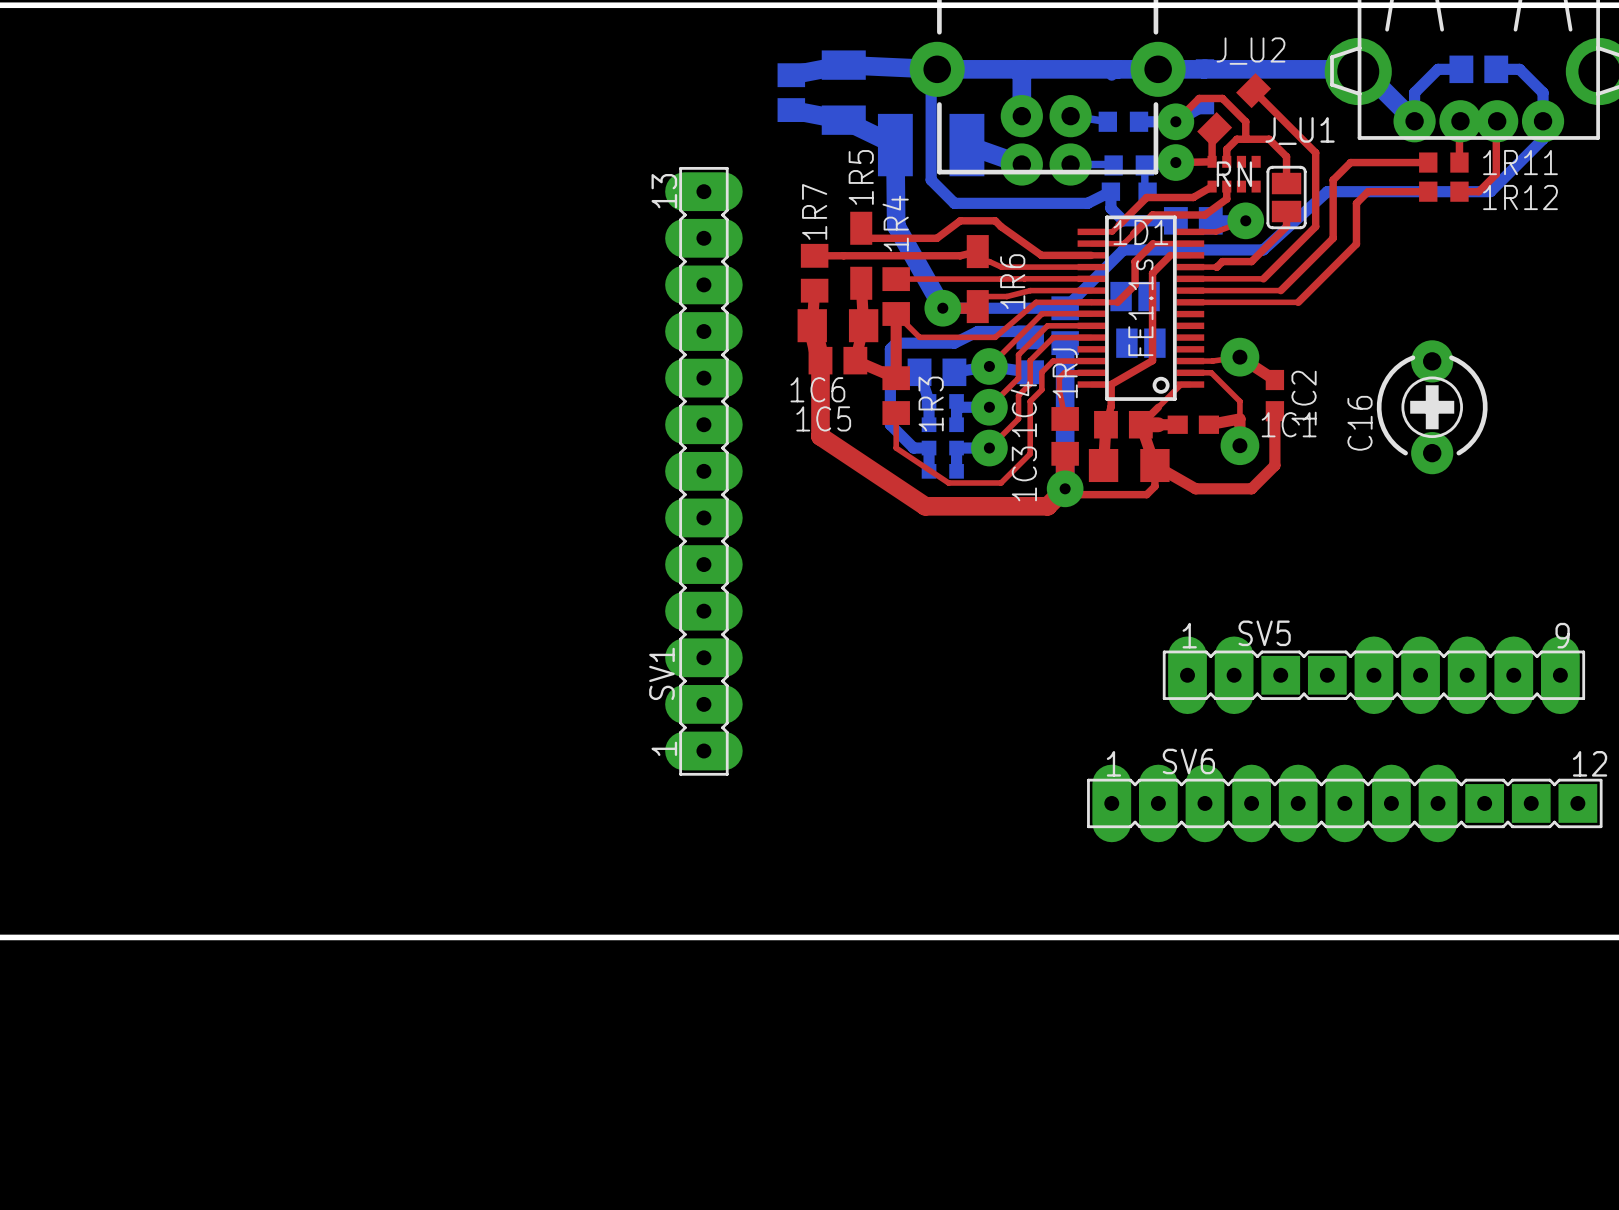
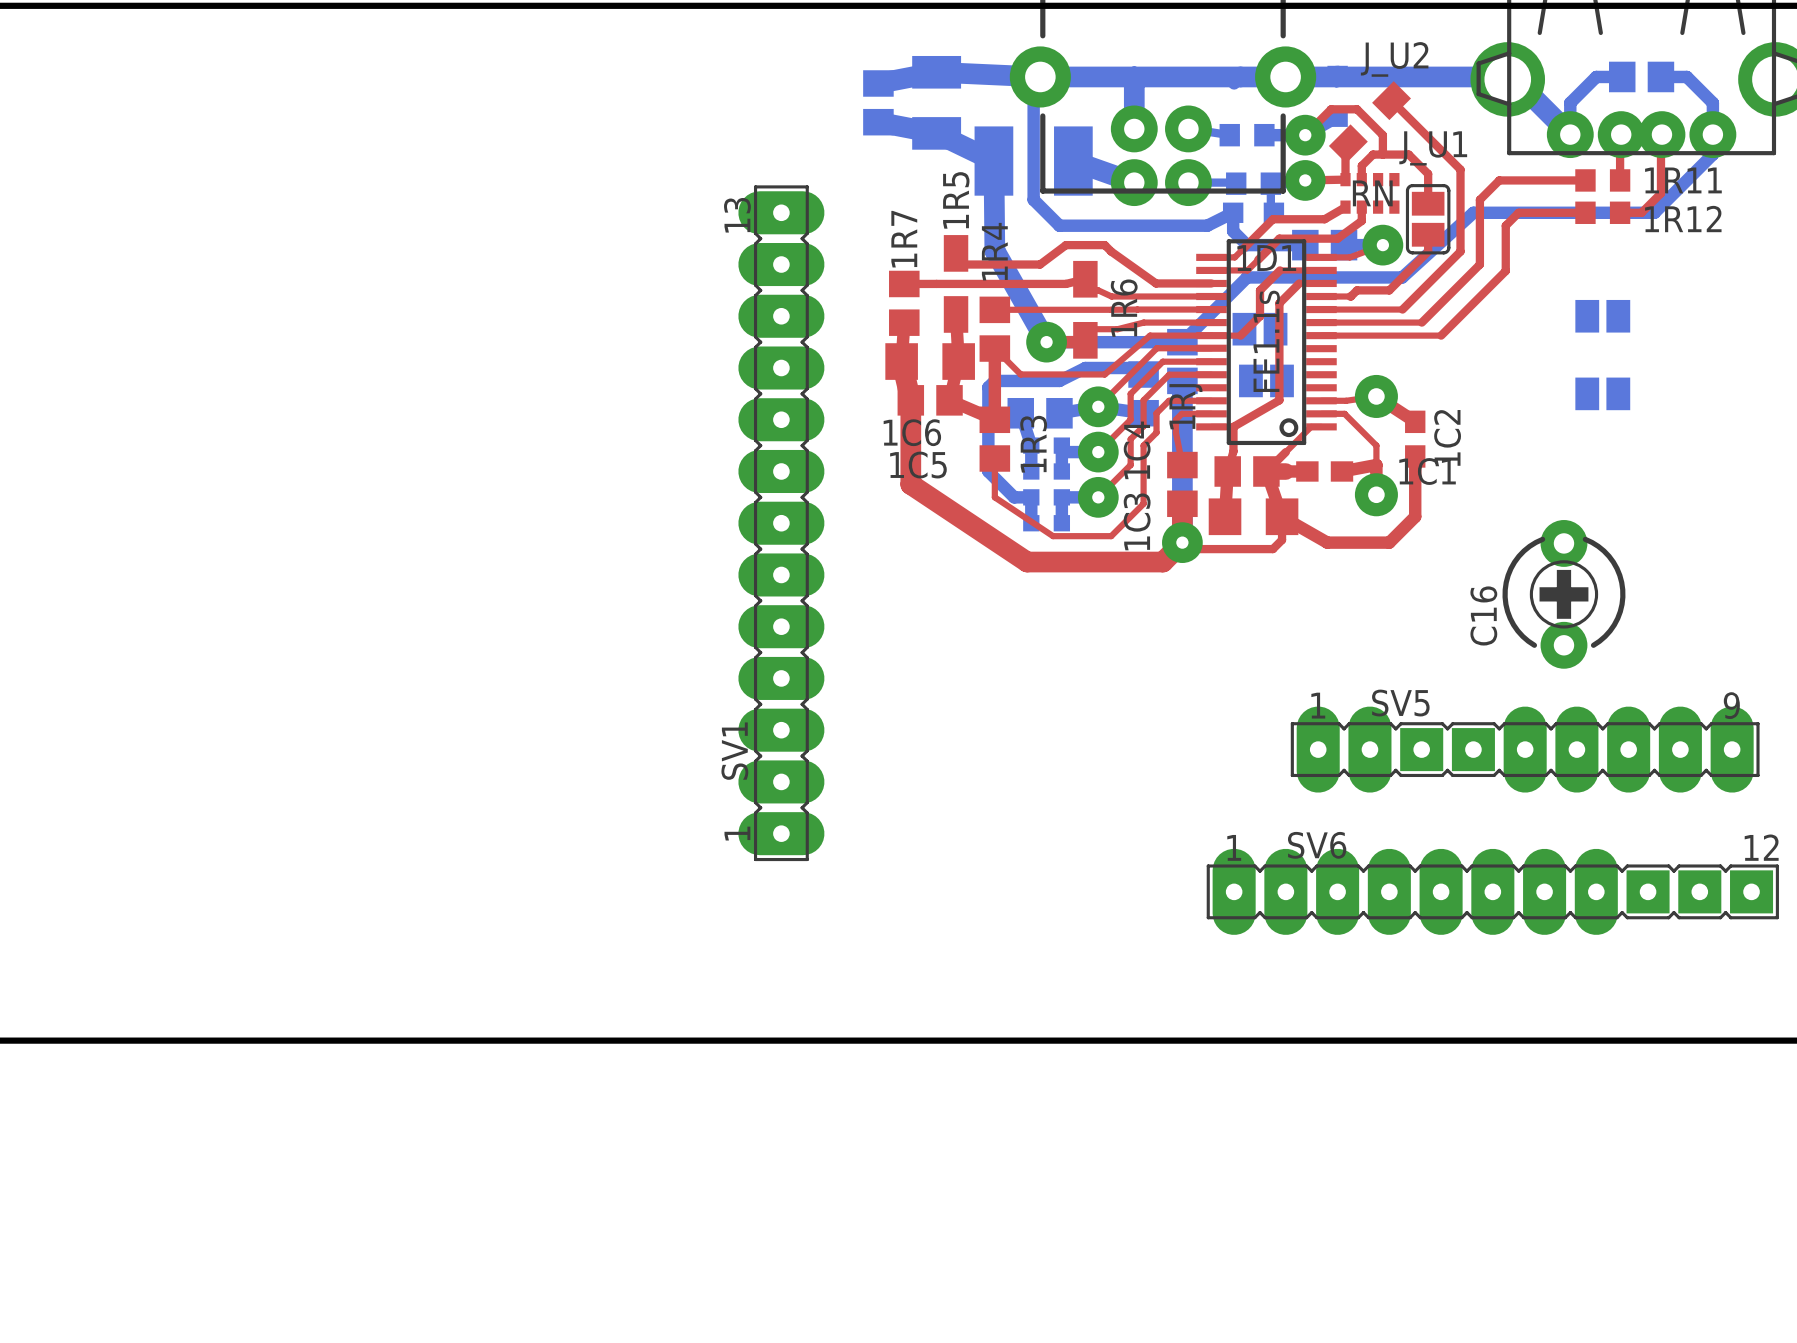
part: none -> (1602, 316)
part: none -> (1602, 393)
C16 position: (1432, 407) -> (1563, 594)

